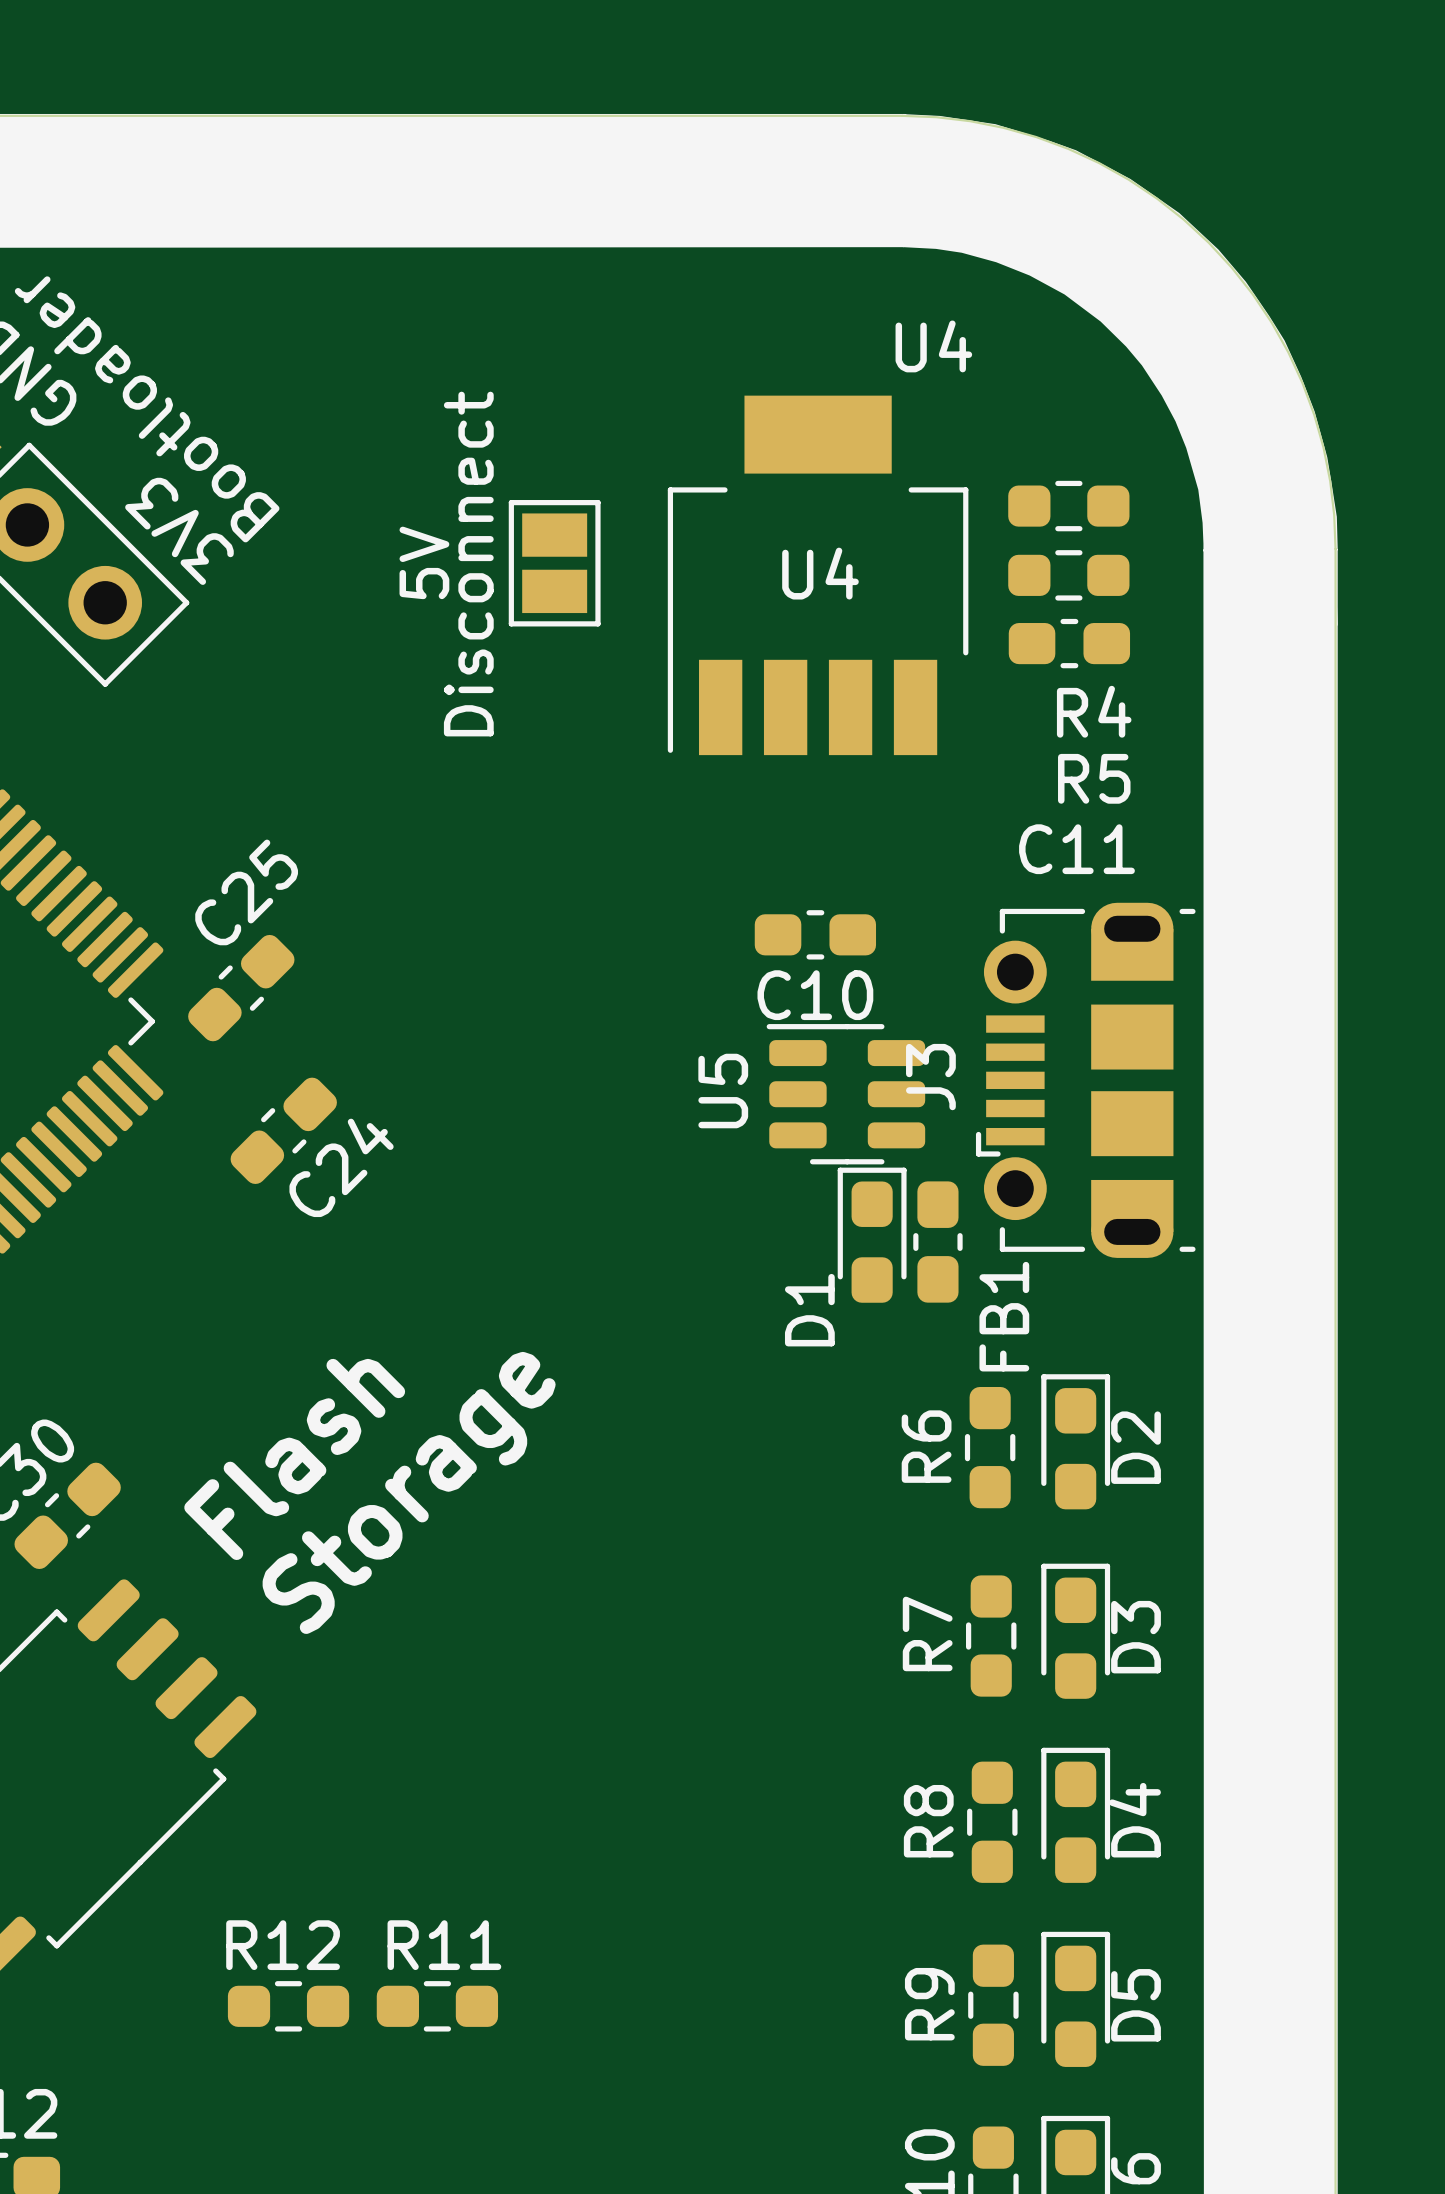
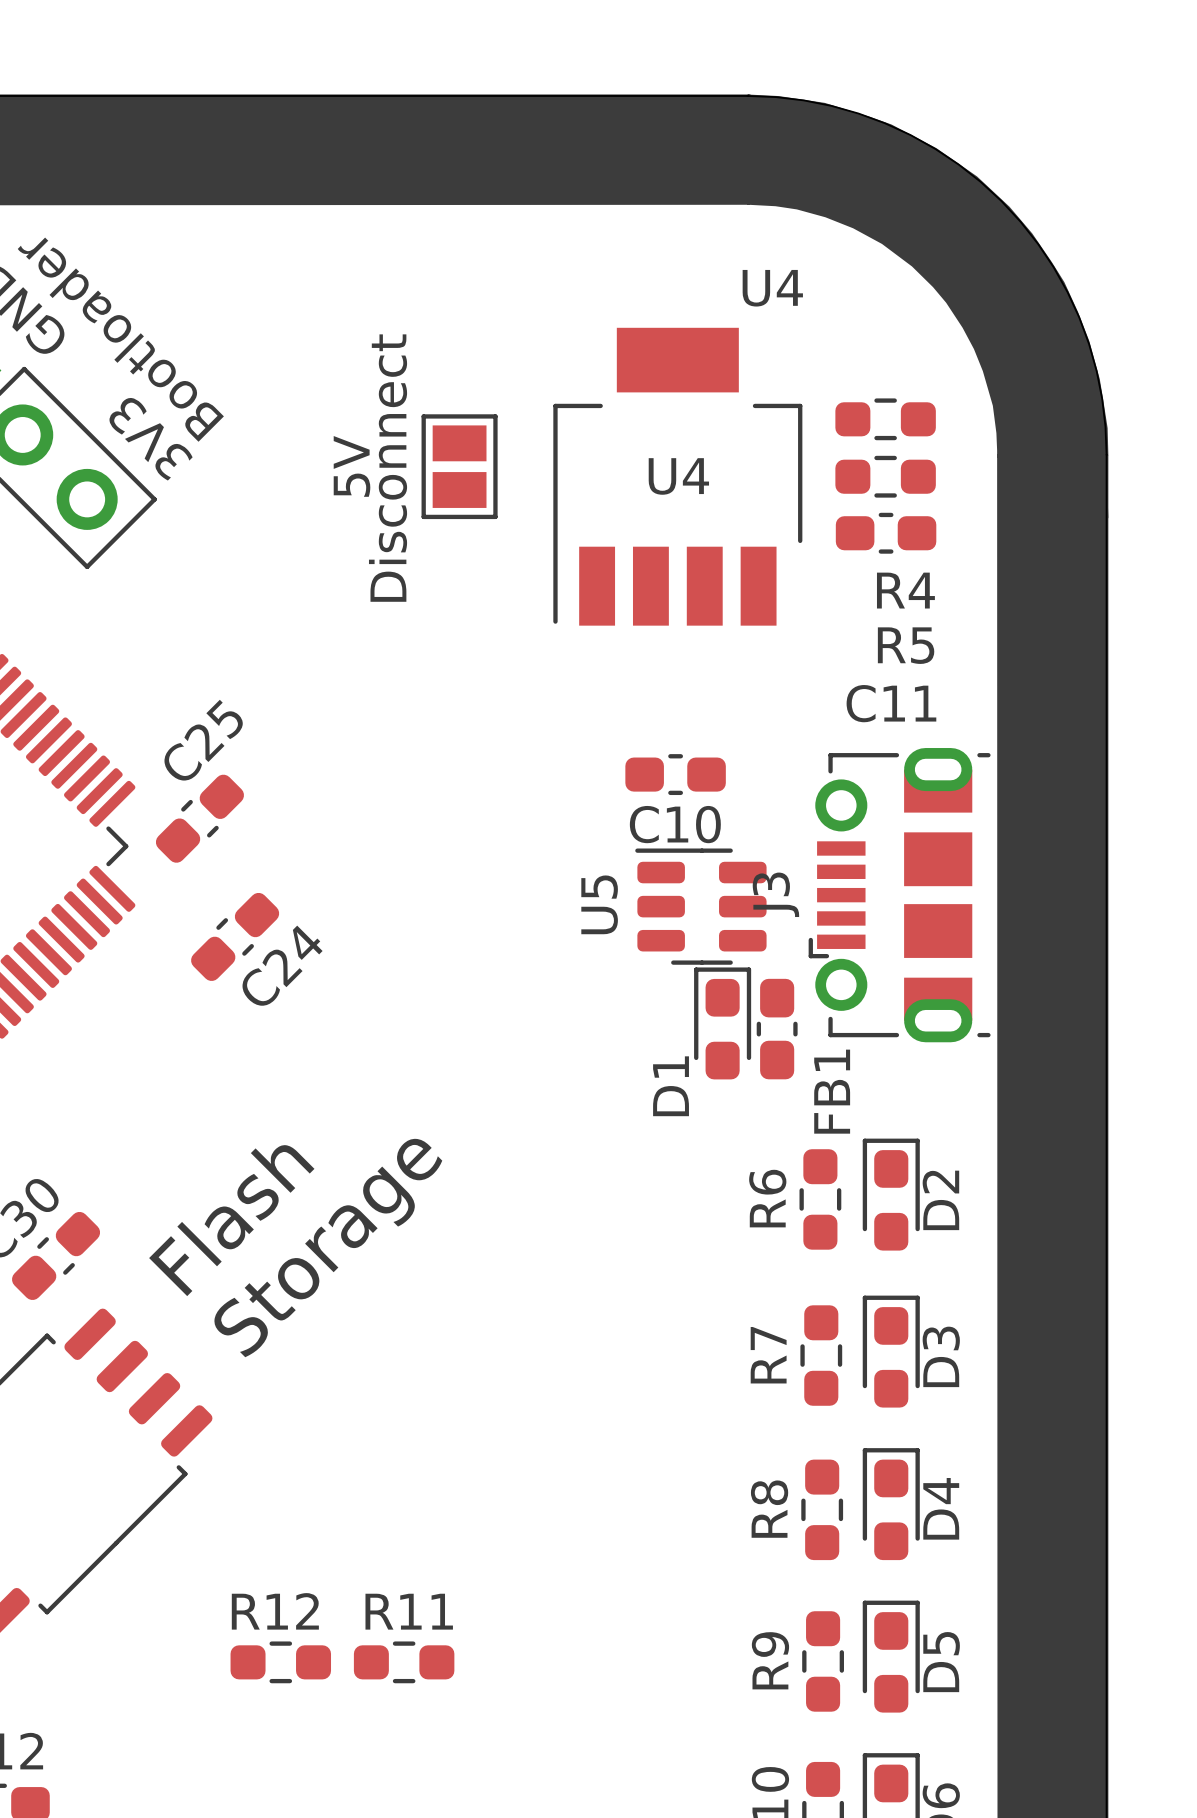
R12 position: (288, 2006) -> (280, 1662)
R11 position: (437, 2006) -> (404, 1662)

